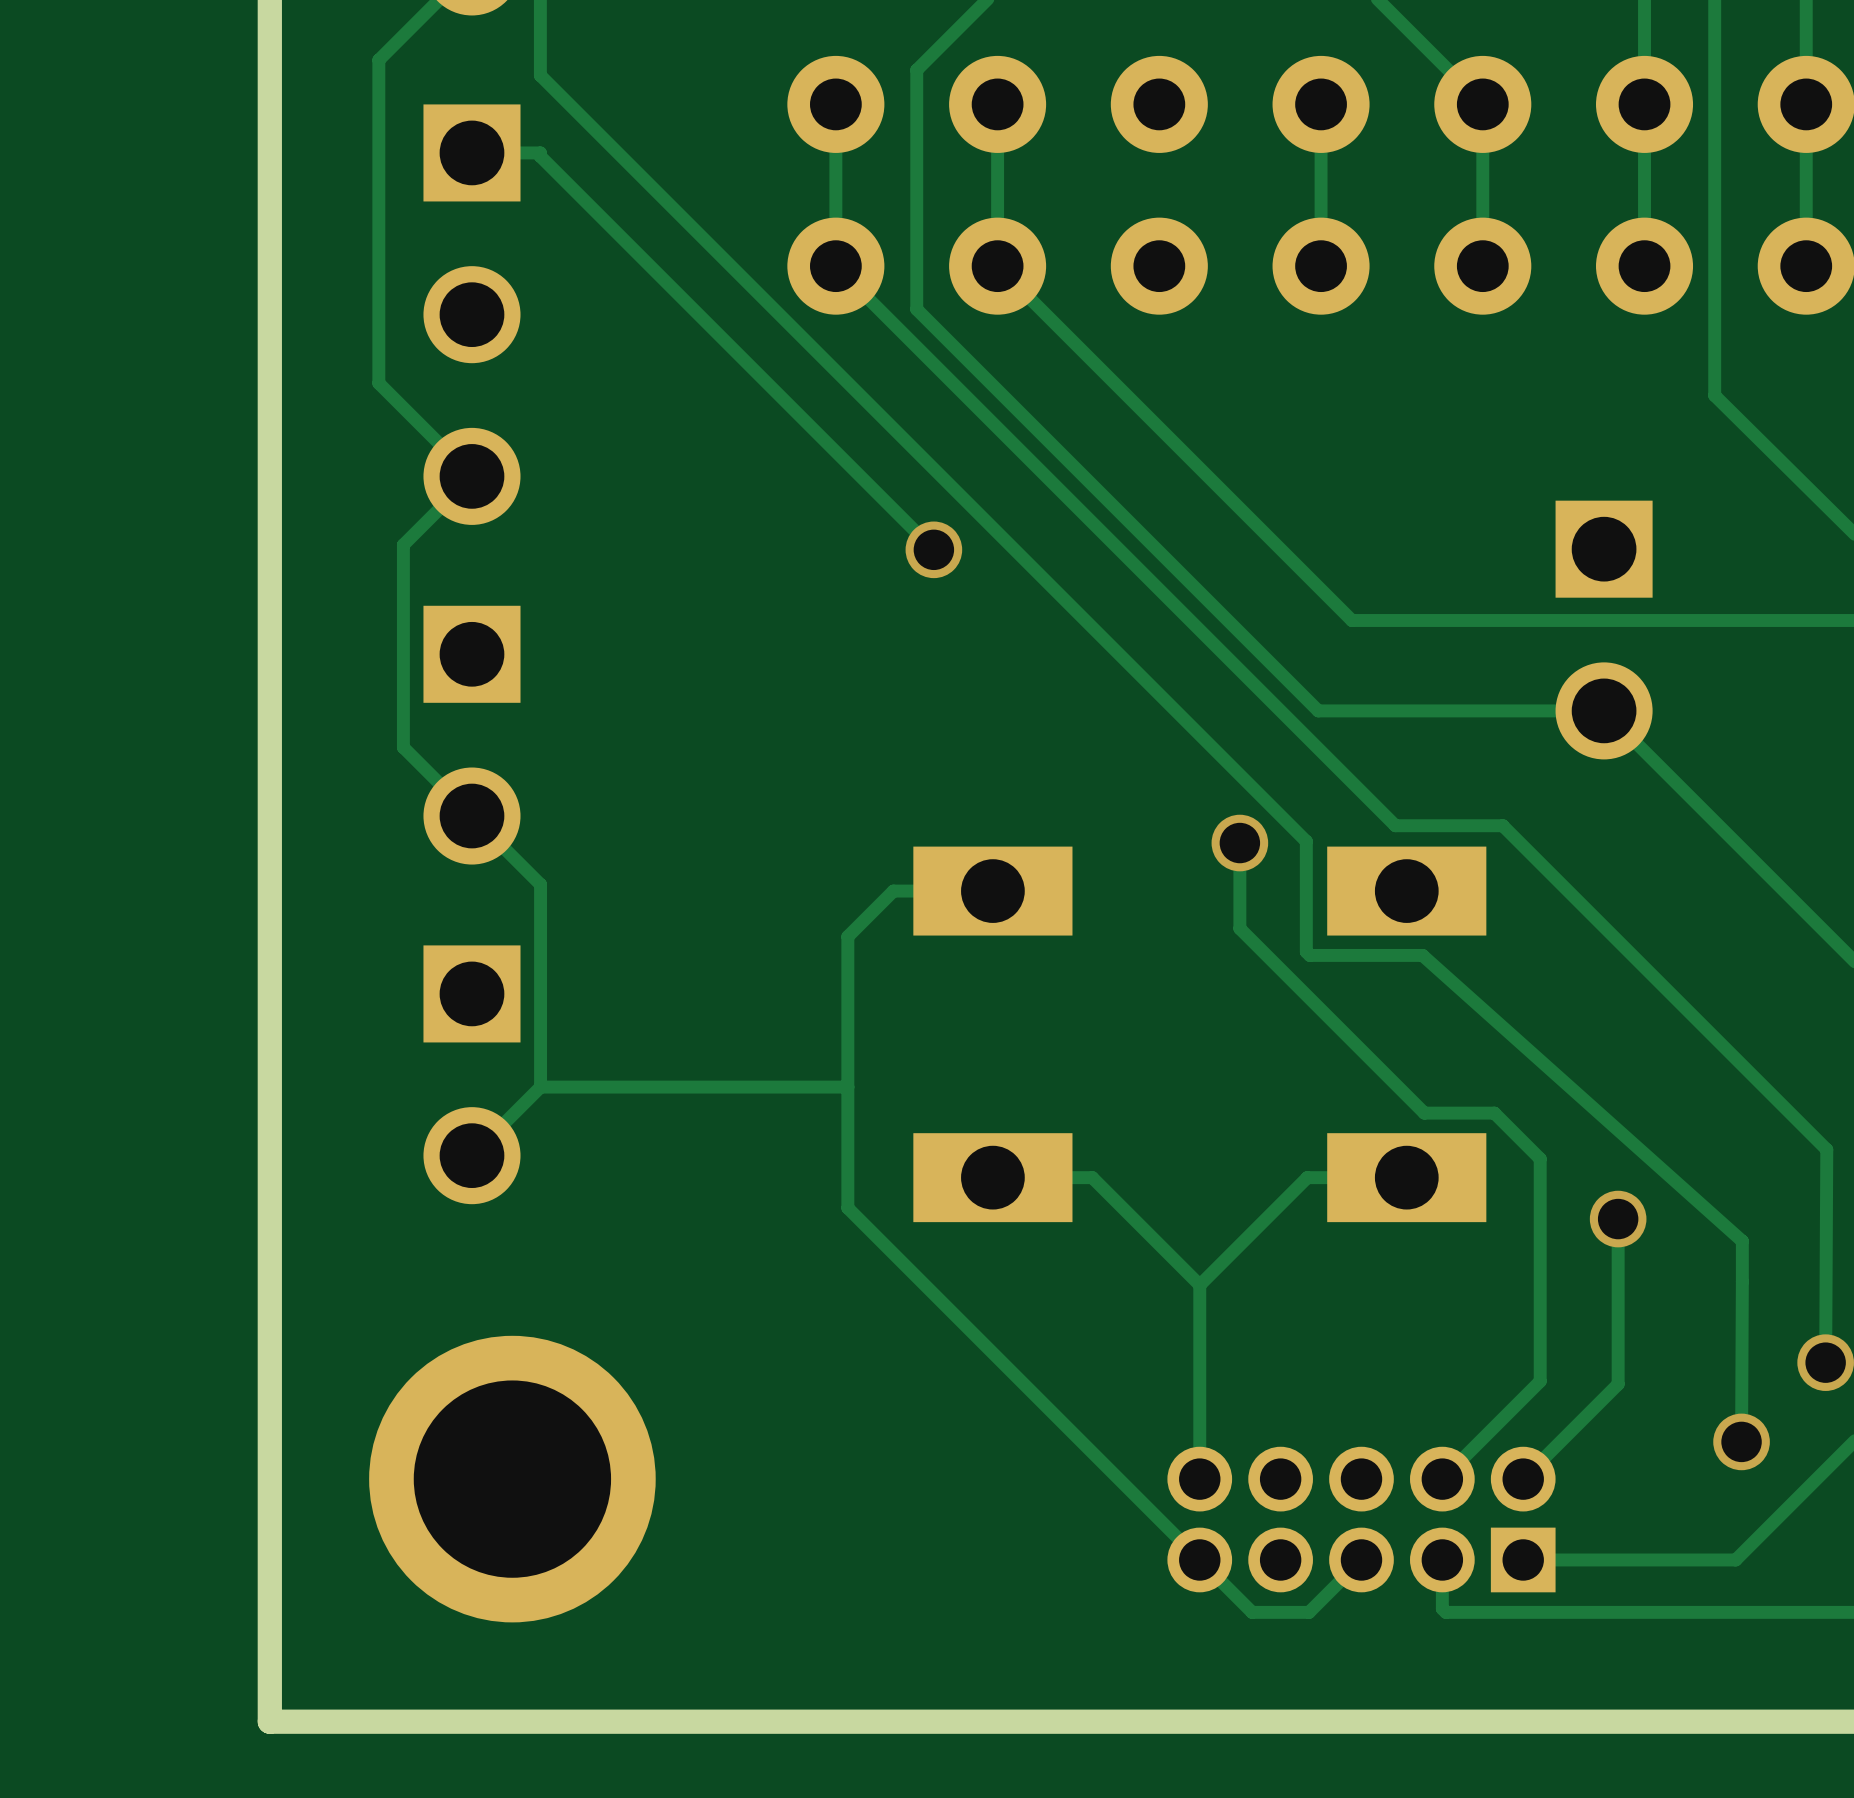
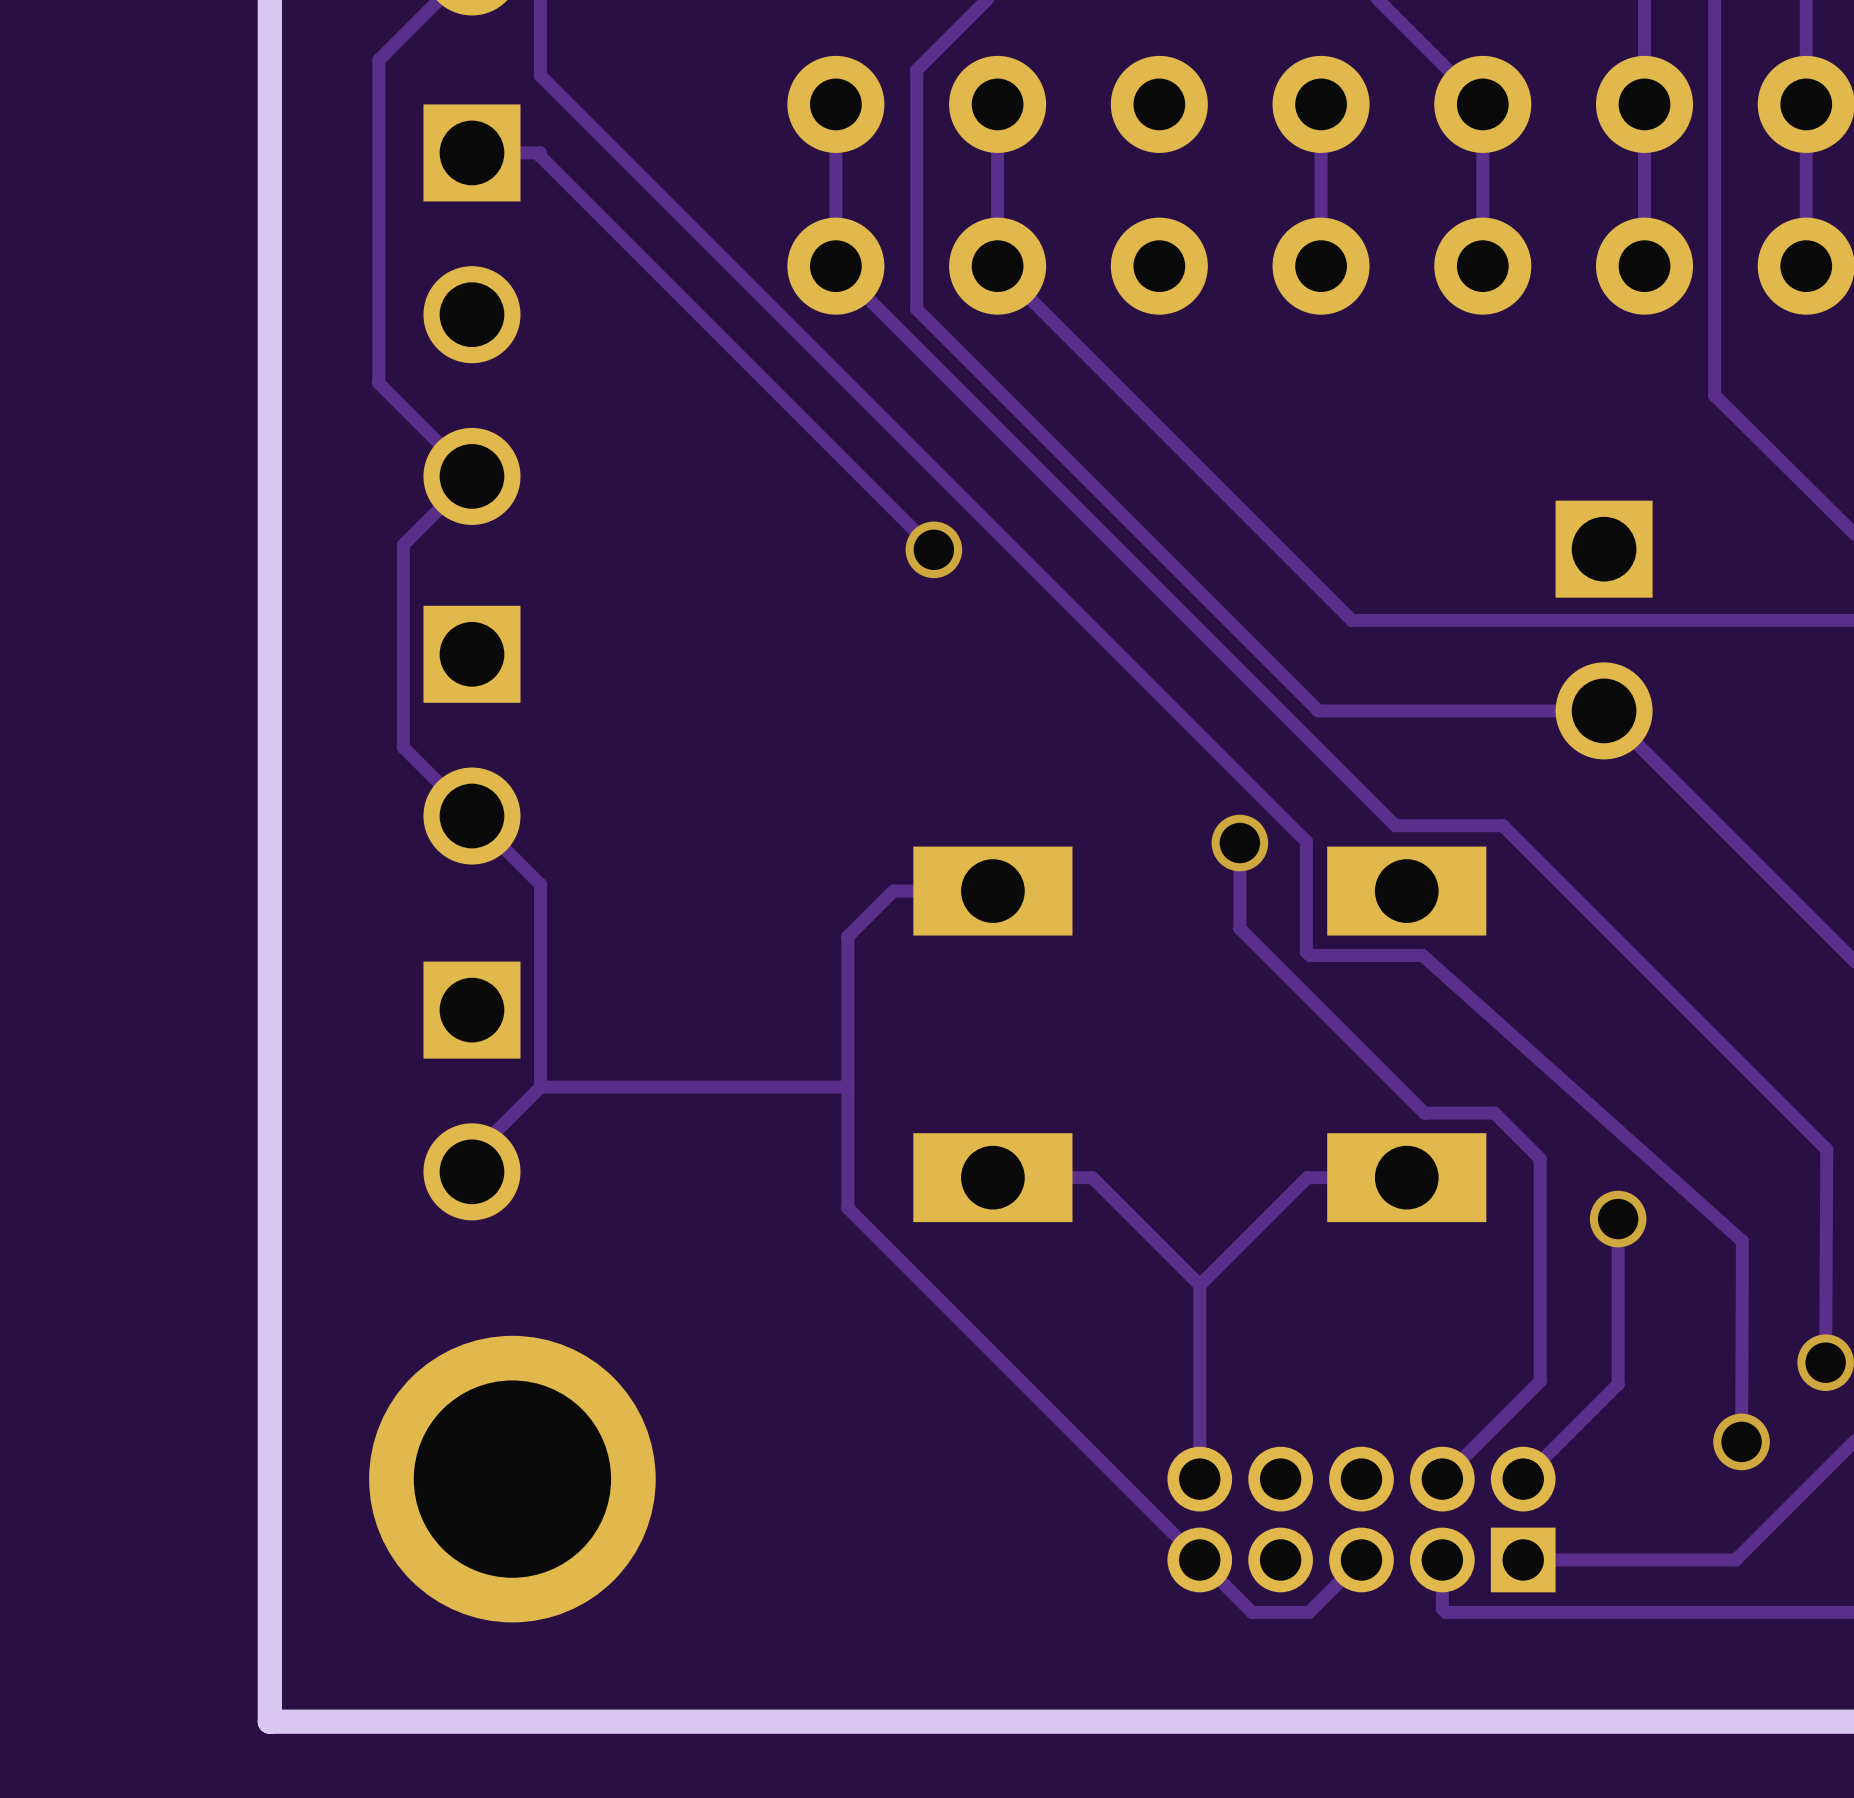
part position: (471, 1074) -> (471, 1090)

